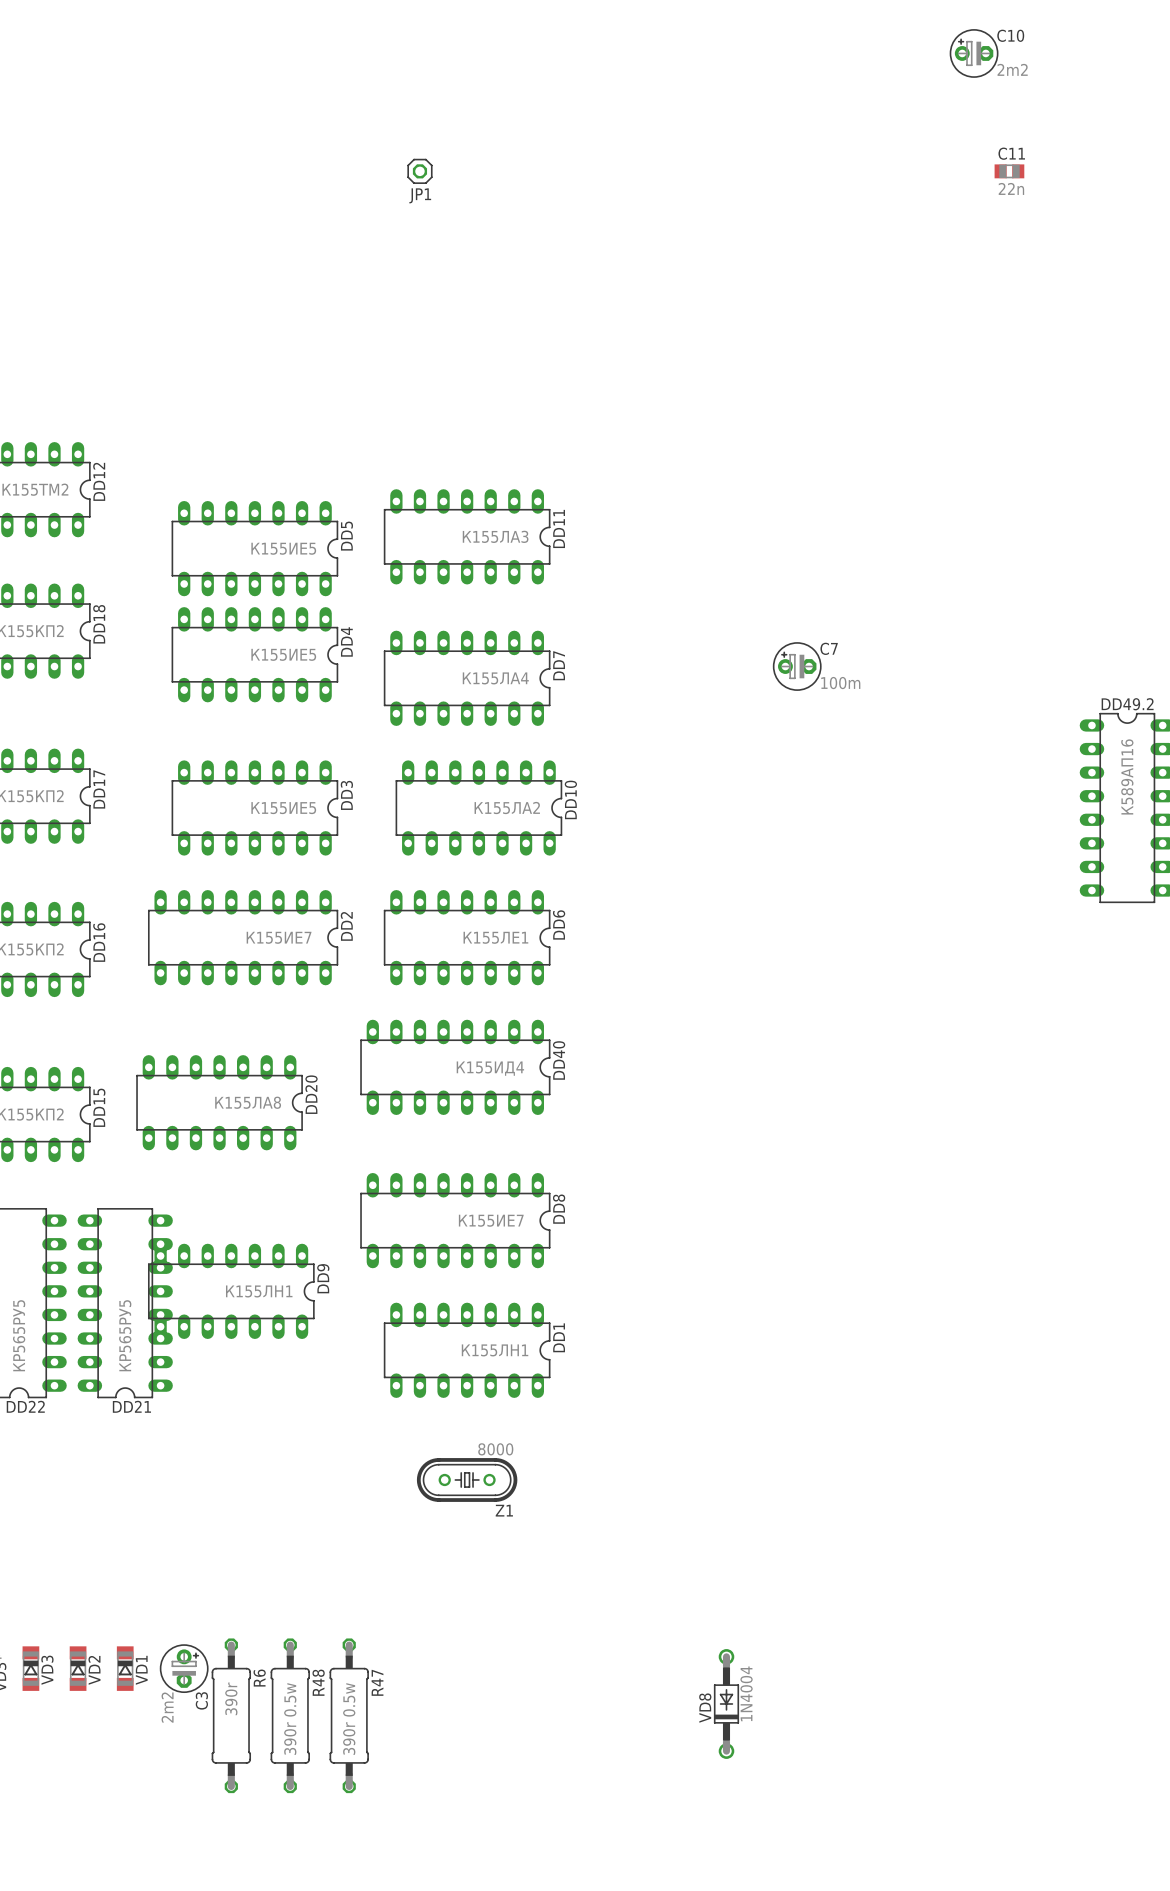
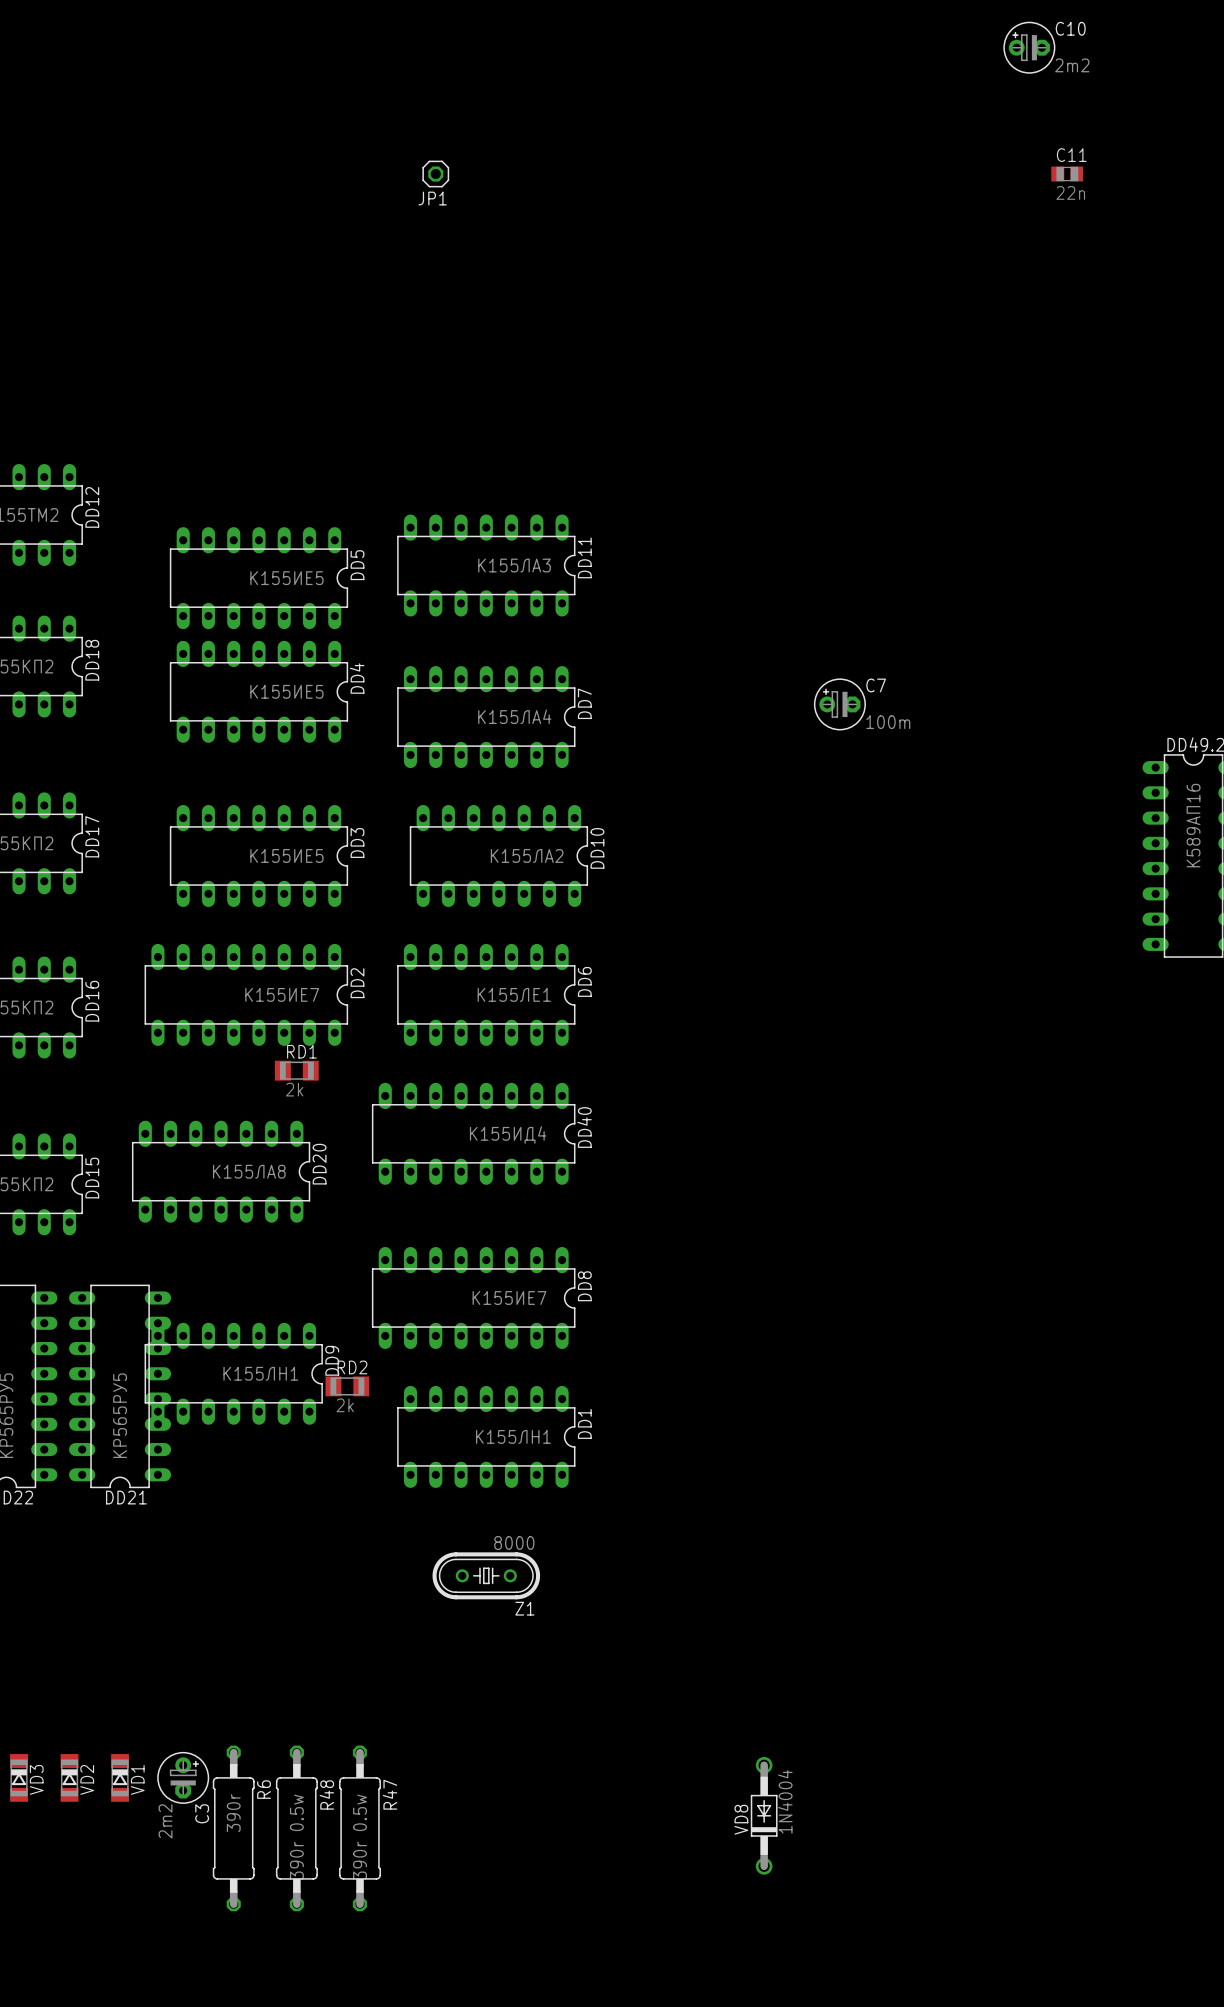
RD1: none -> 2k (296, 1070)
RD2: none -> 2k (347, 1386)

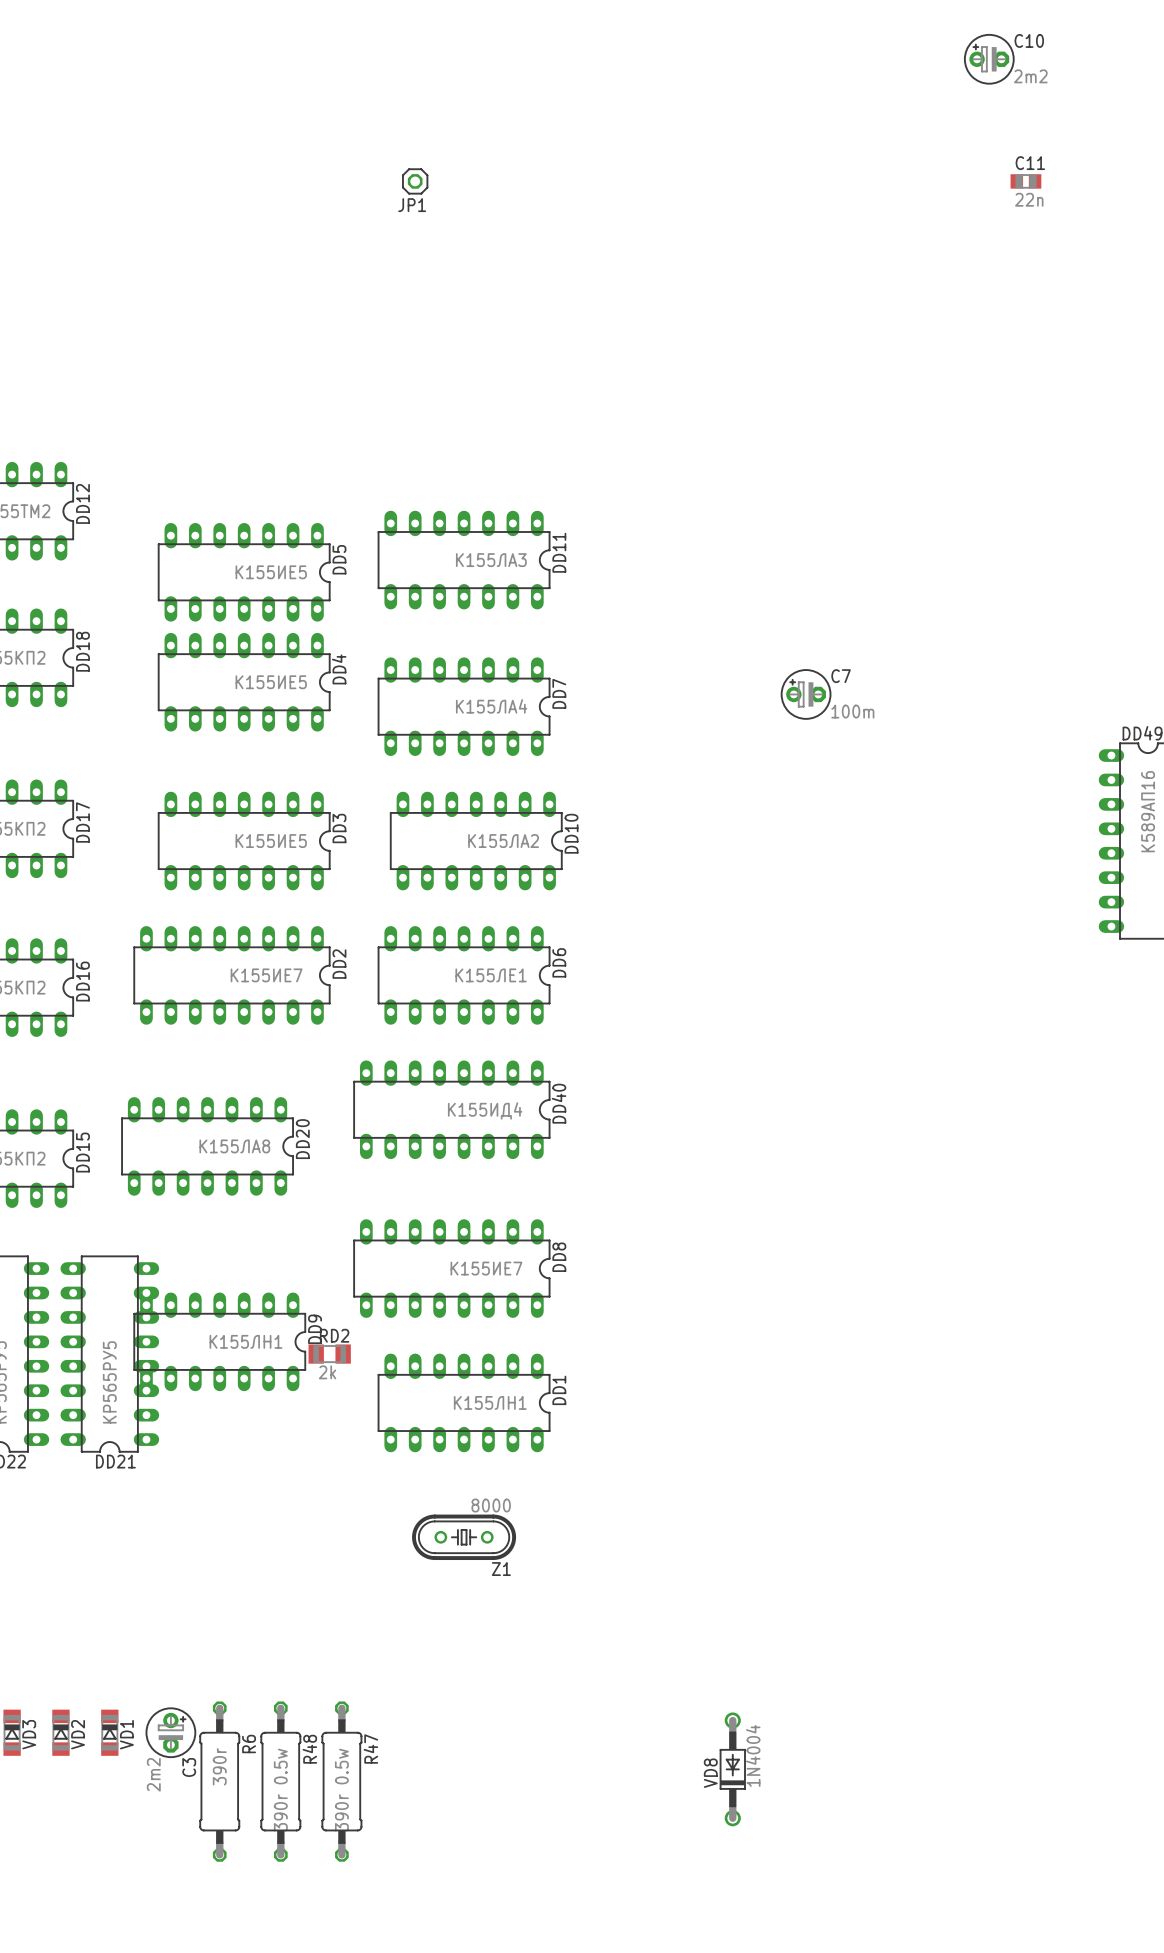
RD1: 2k (296, 1070) -> none

